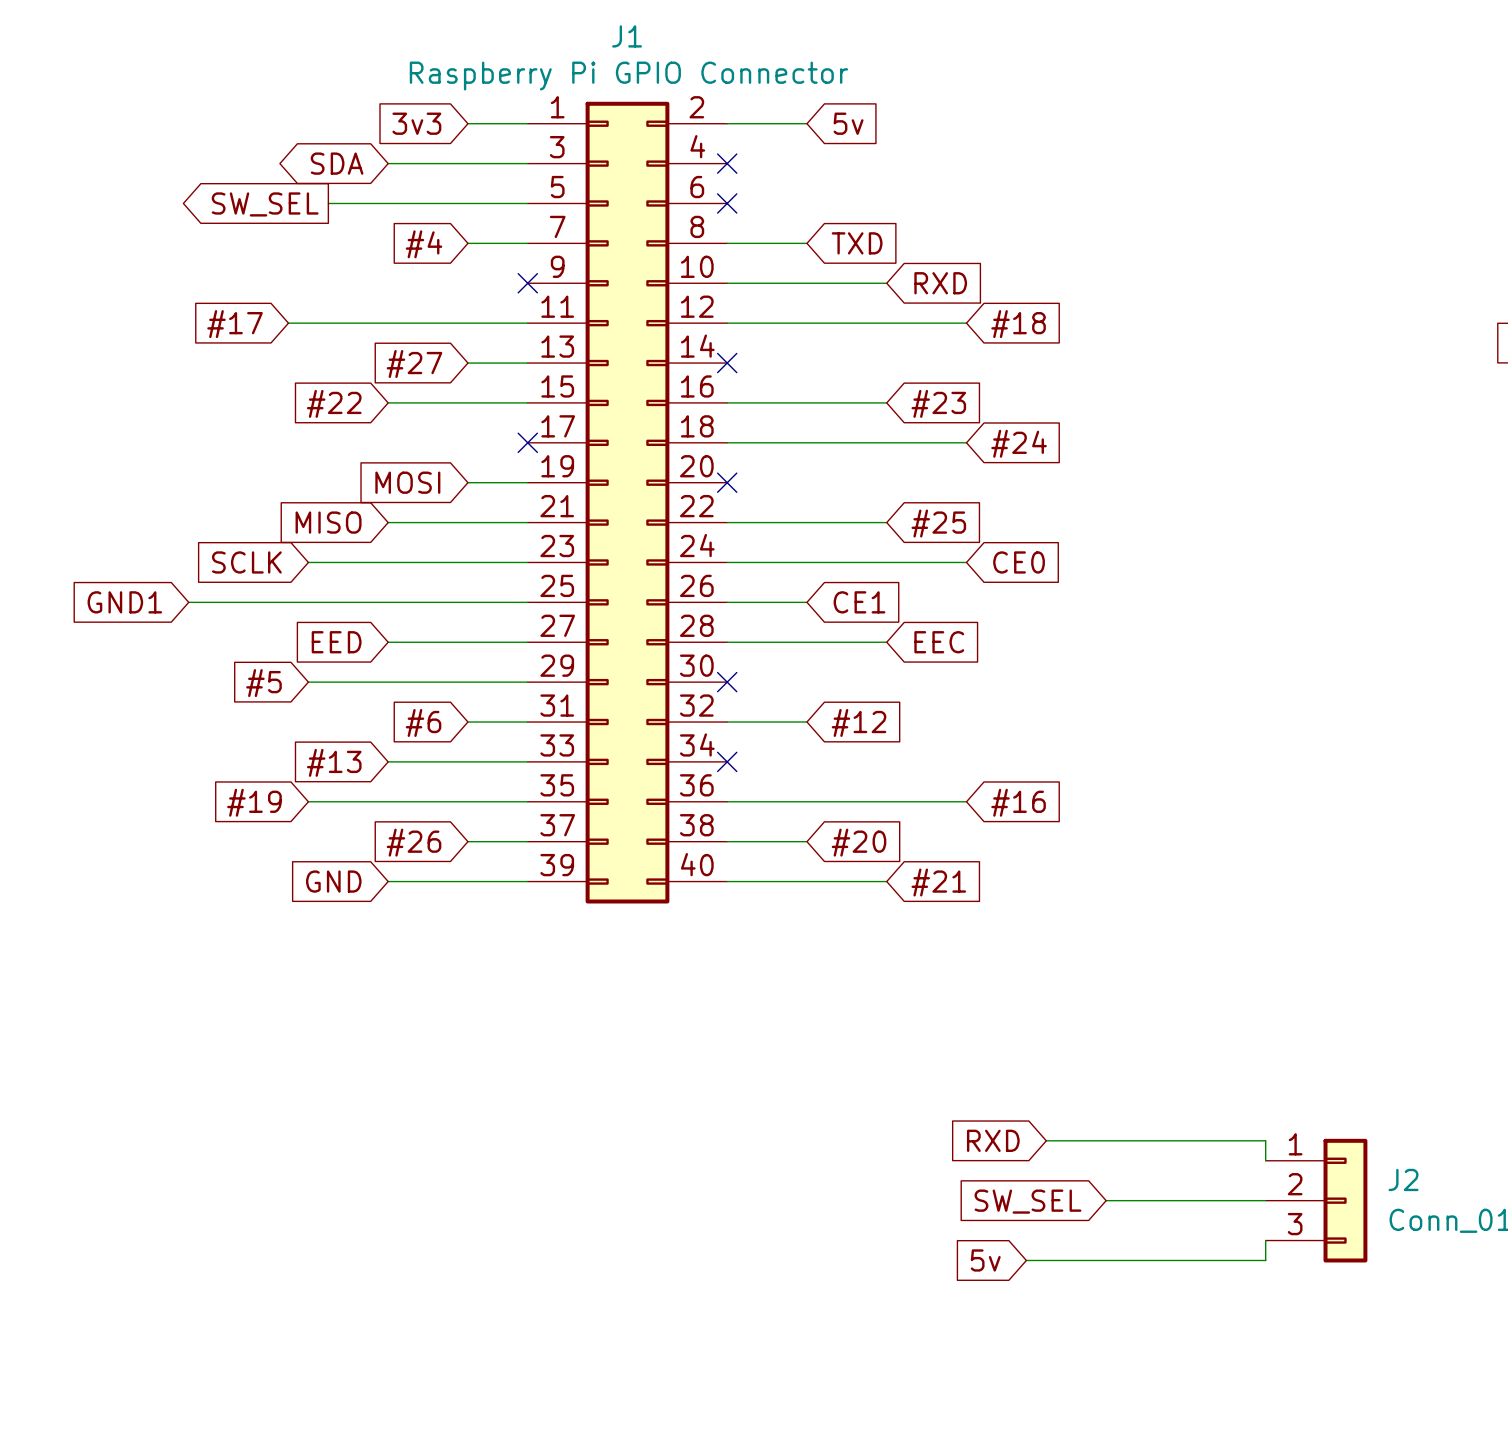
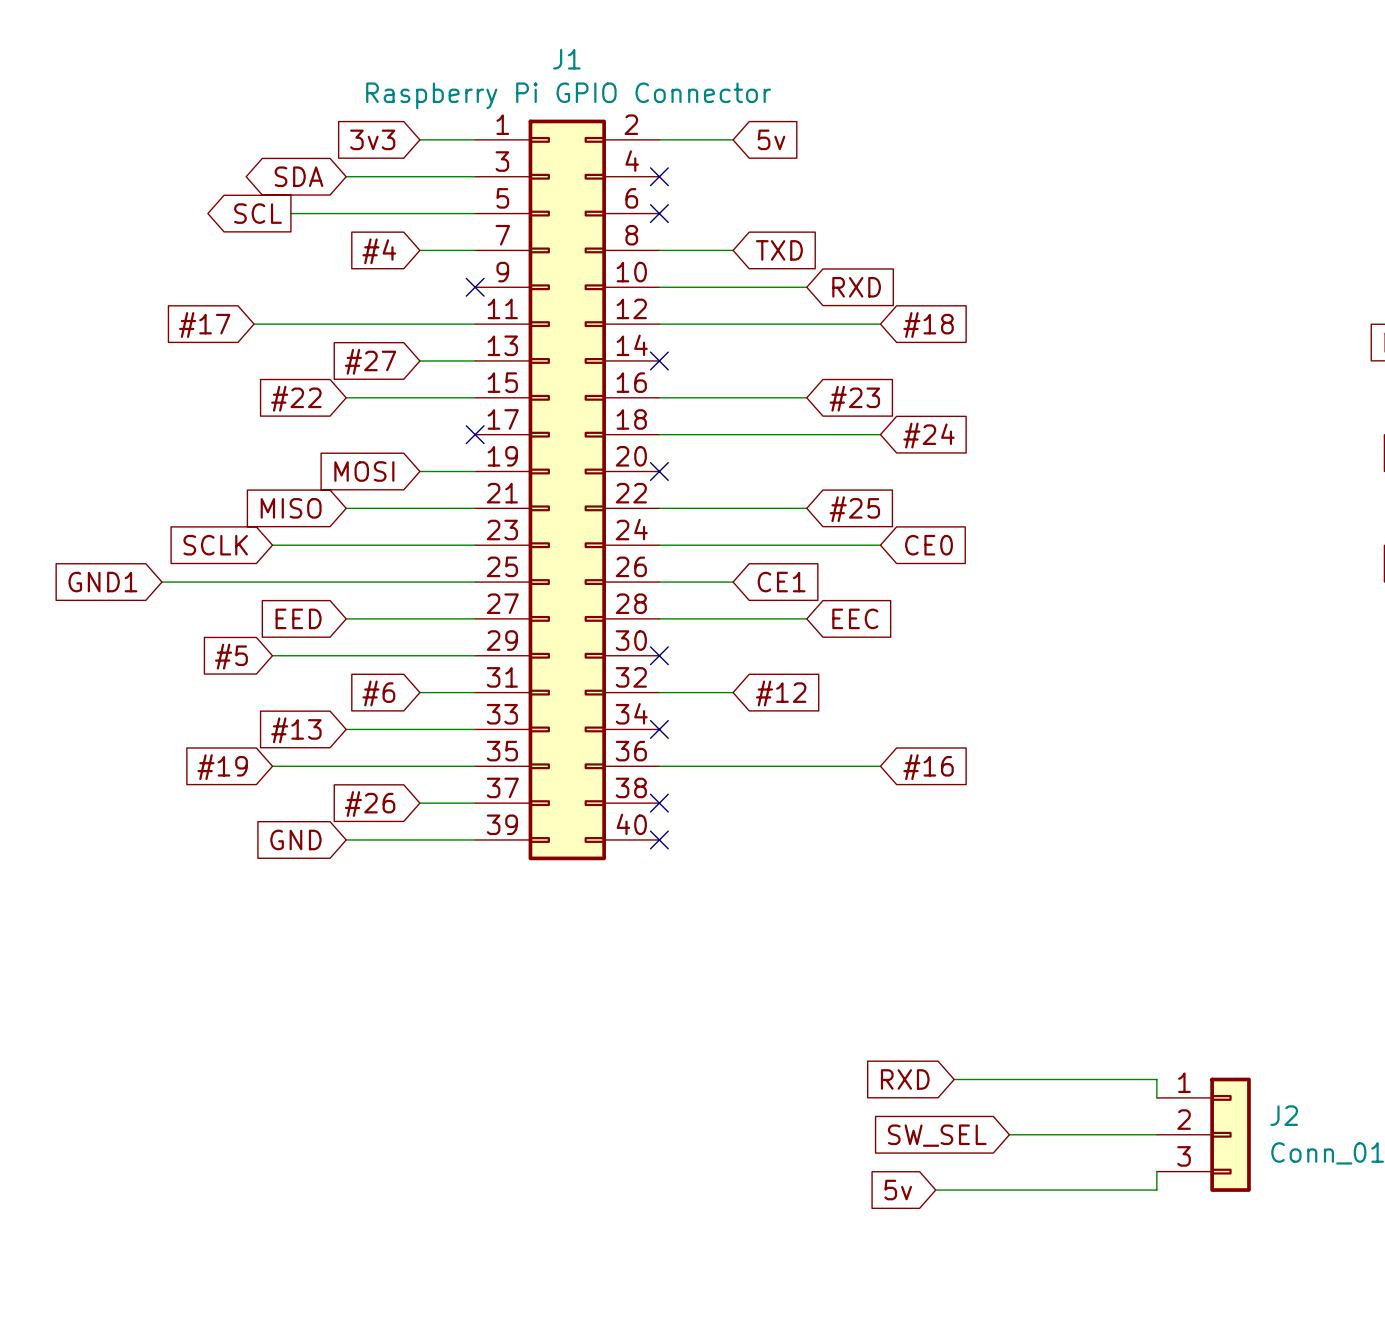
global label: SW_SEL (265, 204) -> SCL (257, 213)
wire: (727, 841) (806, 841) -> none
no-connect mark: none -> (659, 803)
global label: #20 (859, 842) -> none
wire: (727, 881) (886, 881) -> none
no-connect mark: none -> (659, 839)
global label: #21 (938, 882) -> none

